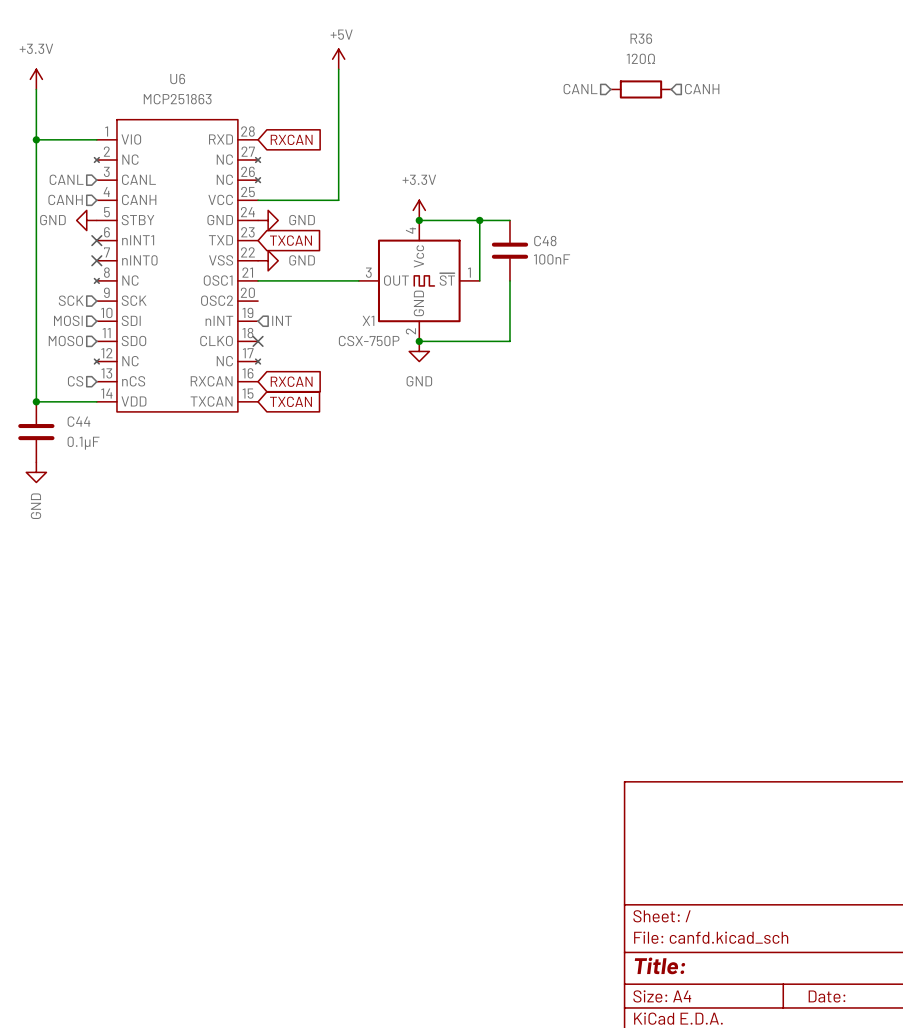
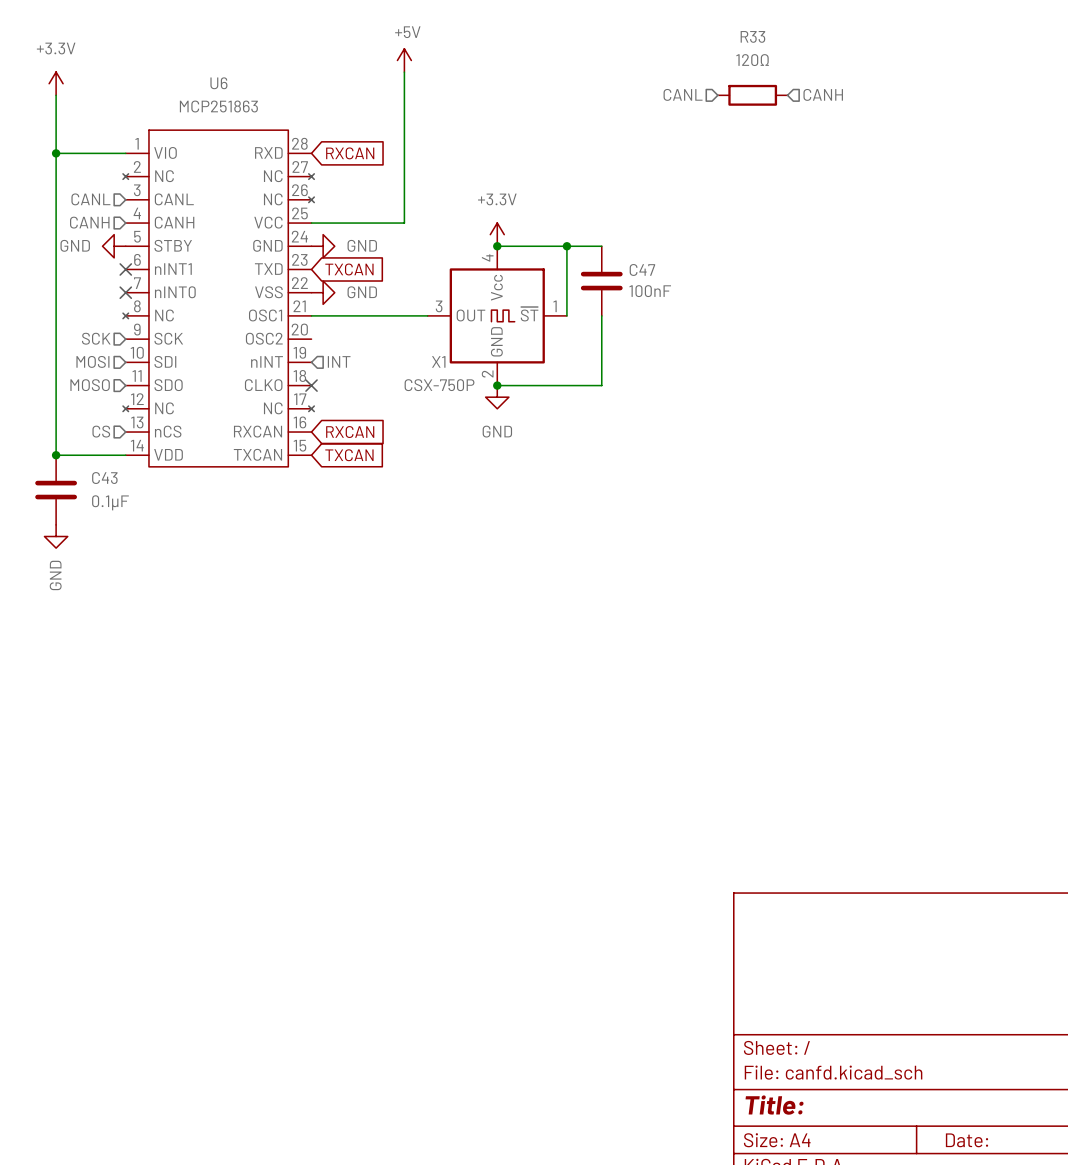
R36 name: R36 (641, 38) -> R33 (752, 36)
C48 name: C48 (545, 241) -> C47 (642, 269)
C44 name: C44 (78, 421) -> C43 (104, 478)

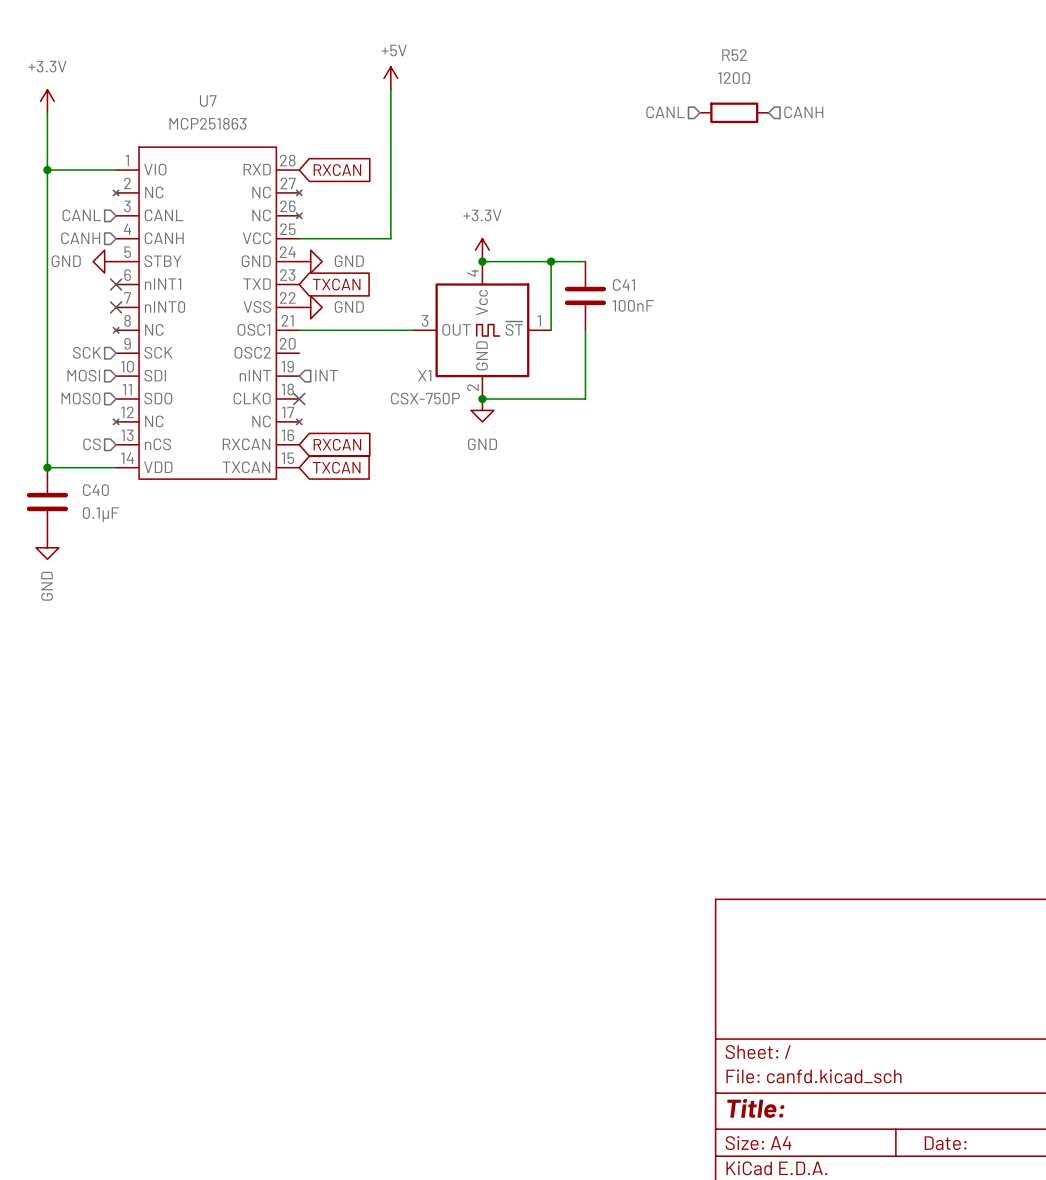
R33 name: R33 (752, 36) -> R52 (734, 55)
U6 name: U6 (218, 83) -> U7 (208, 100)
C47 name: C47 (642, 269) -> C41 (623, 285)
C43 name: C43 (104, 478) -> C40 (95, 490)

